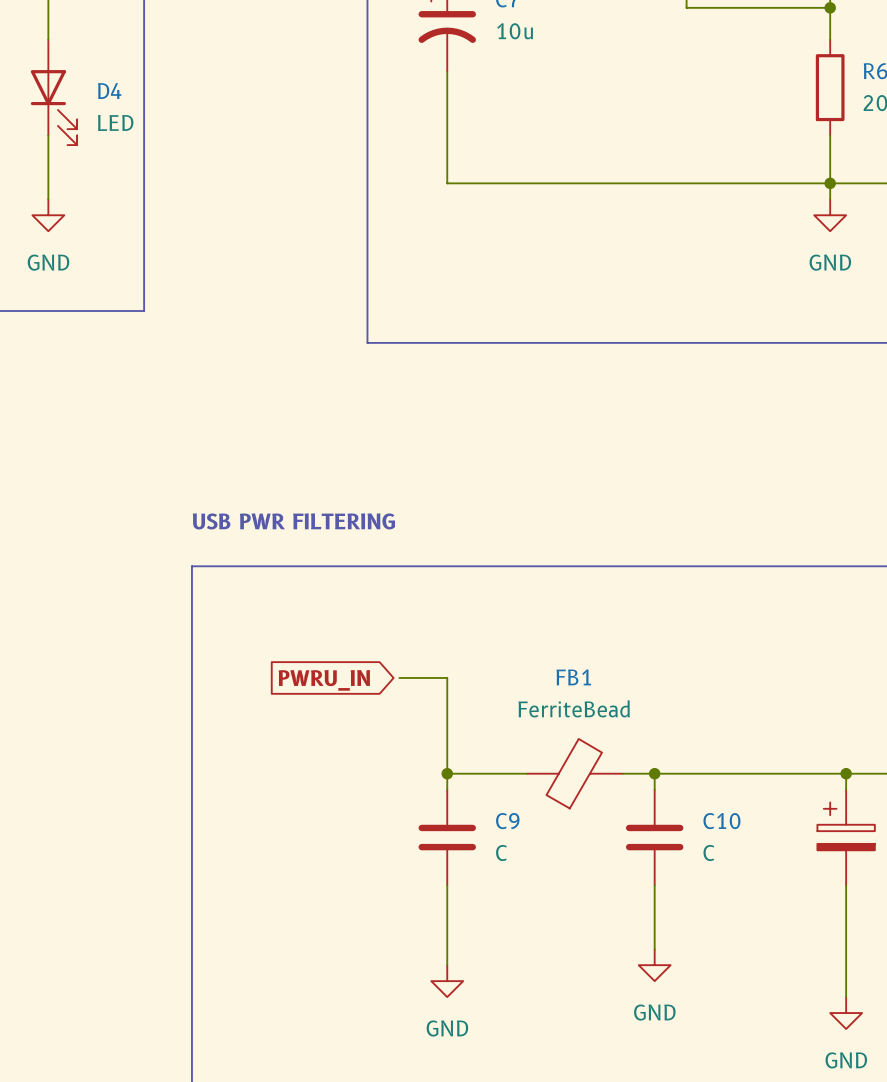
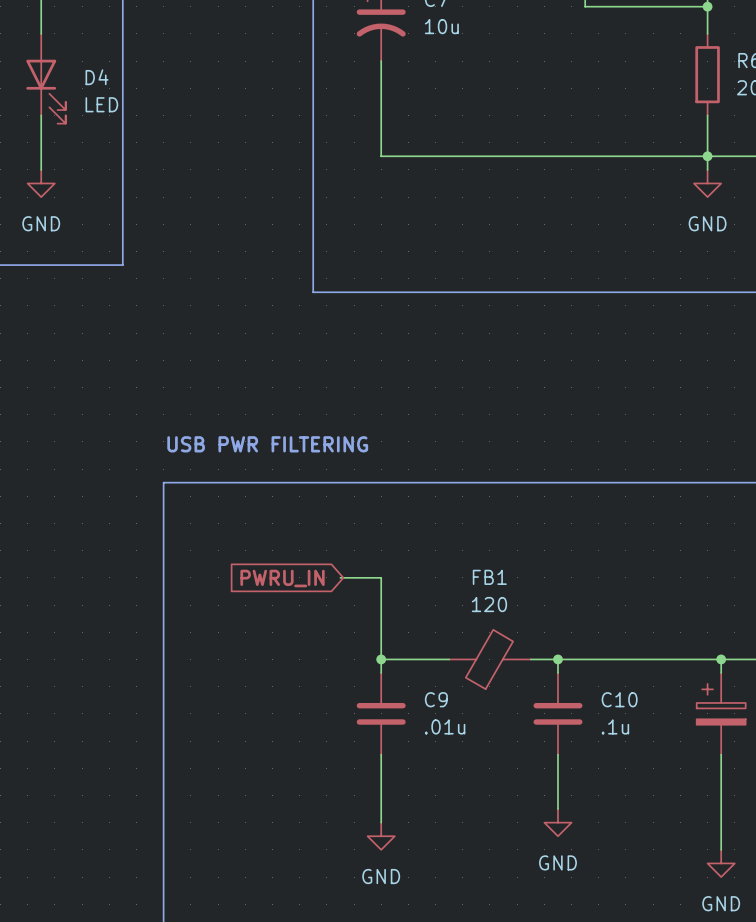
FB1 value: FerriteBead (574, 708) -> 120 (489, 604)
C9 value: C (501, 852) -> .01u (445, 726)
C10 value: C (708, 852) -> .1u (615, 726)

